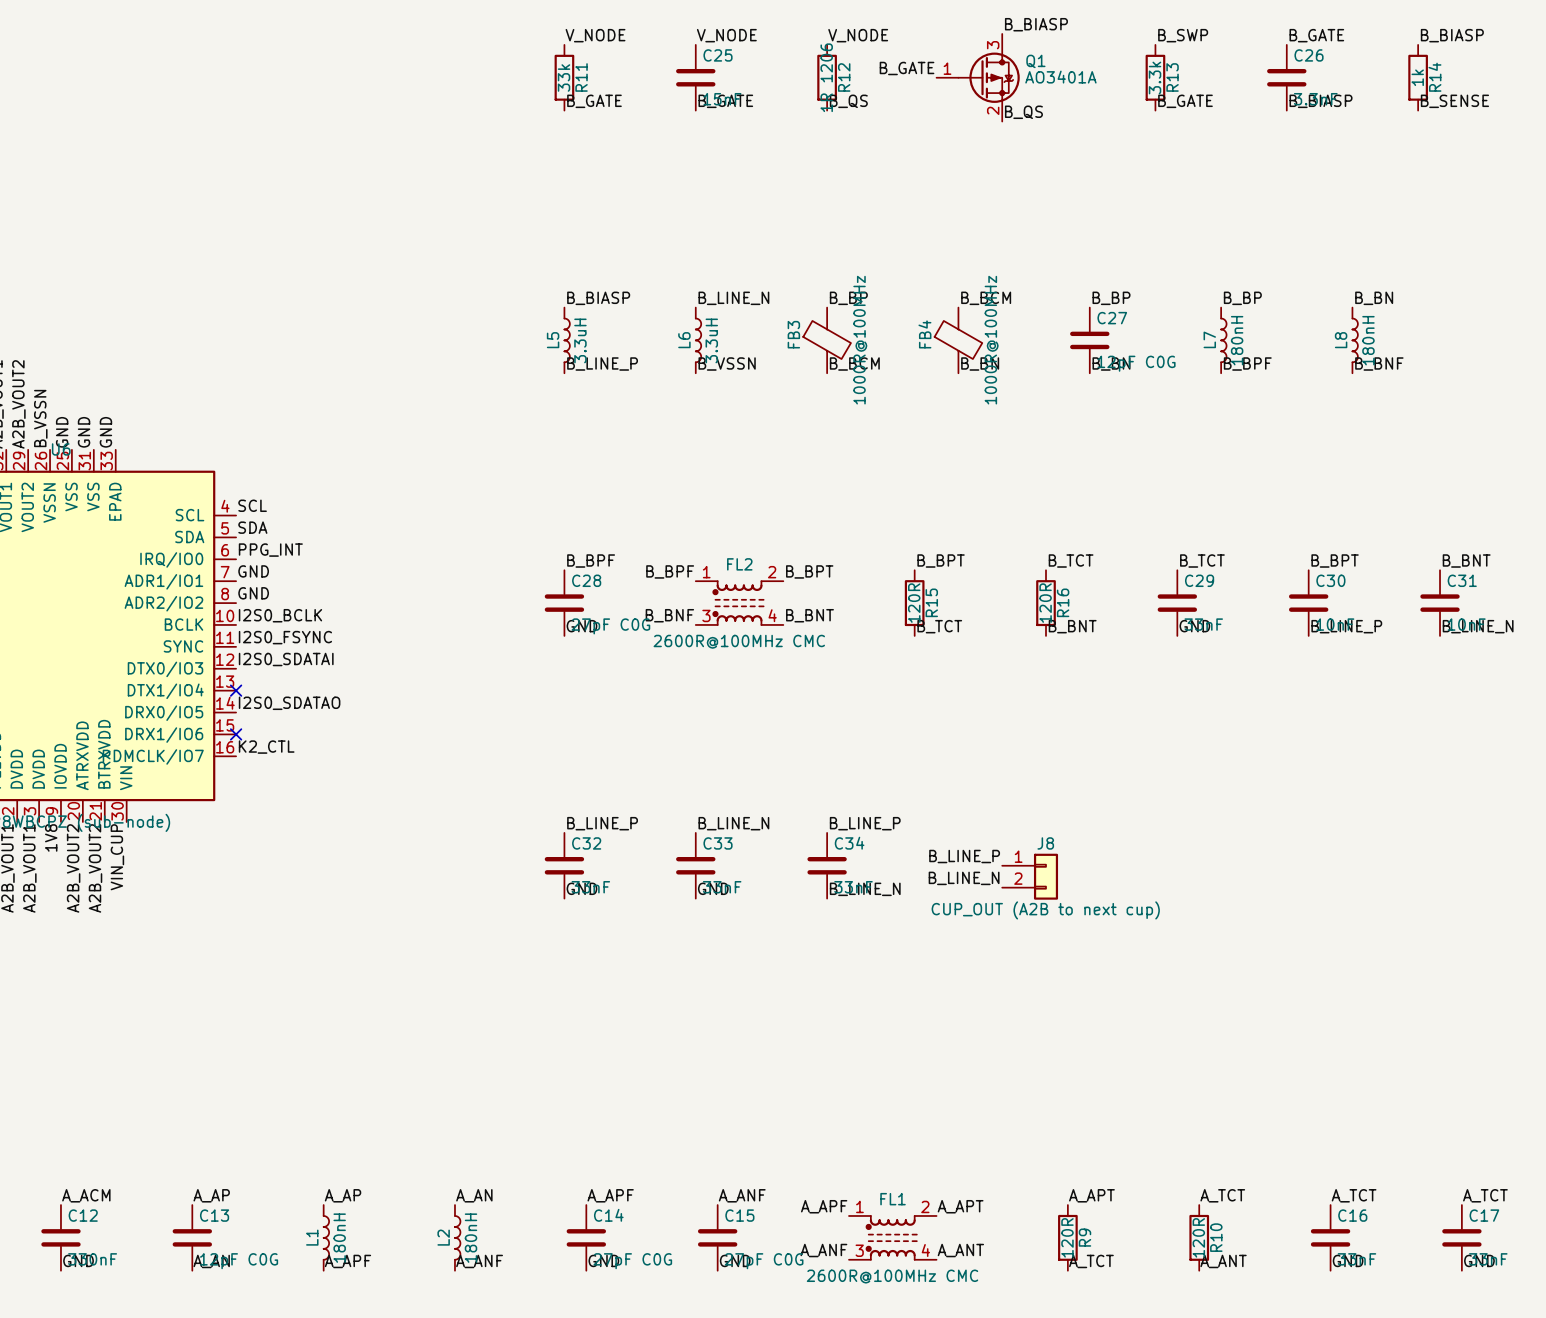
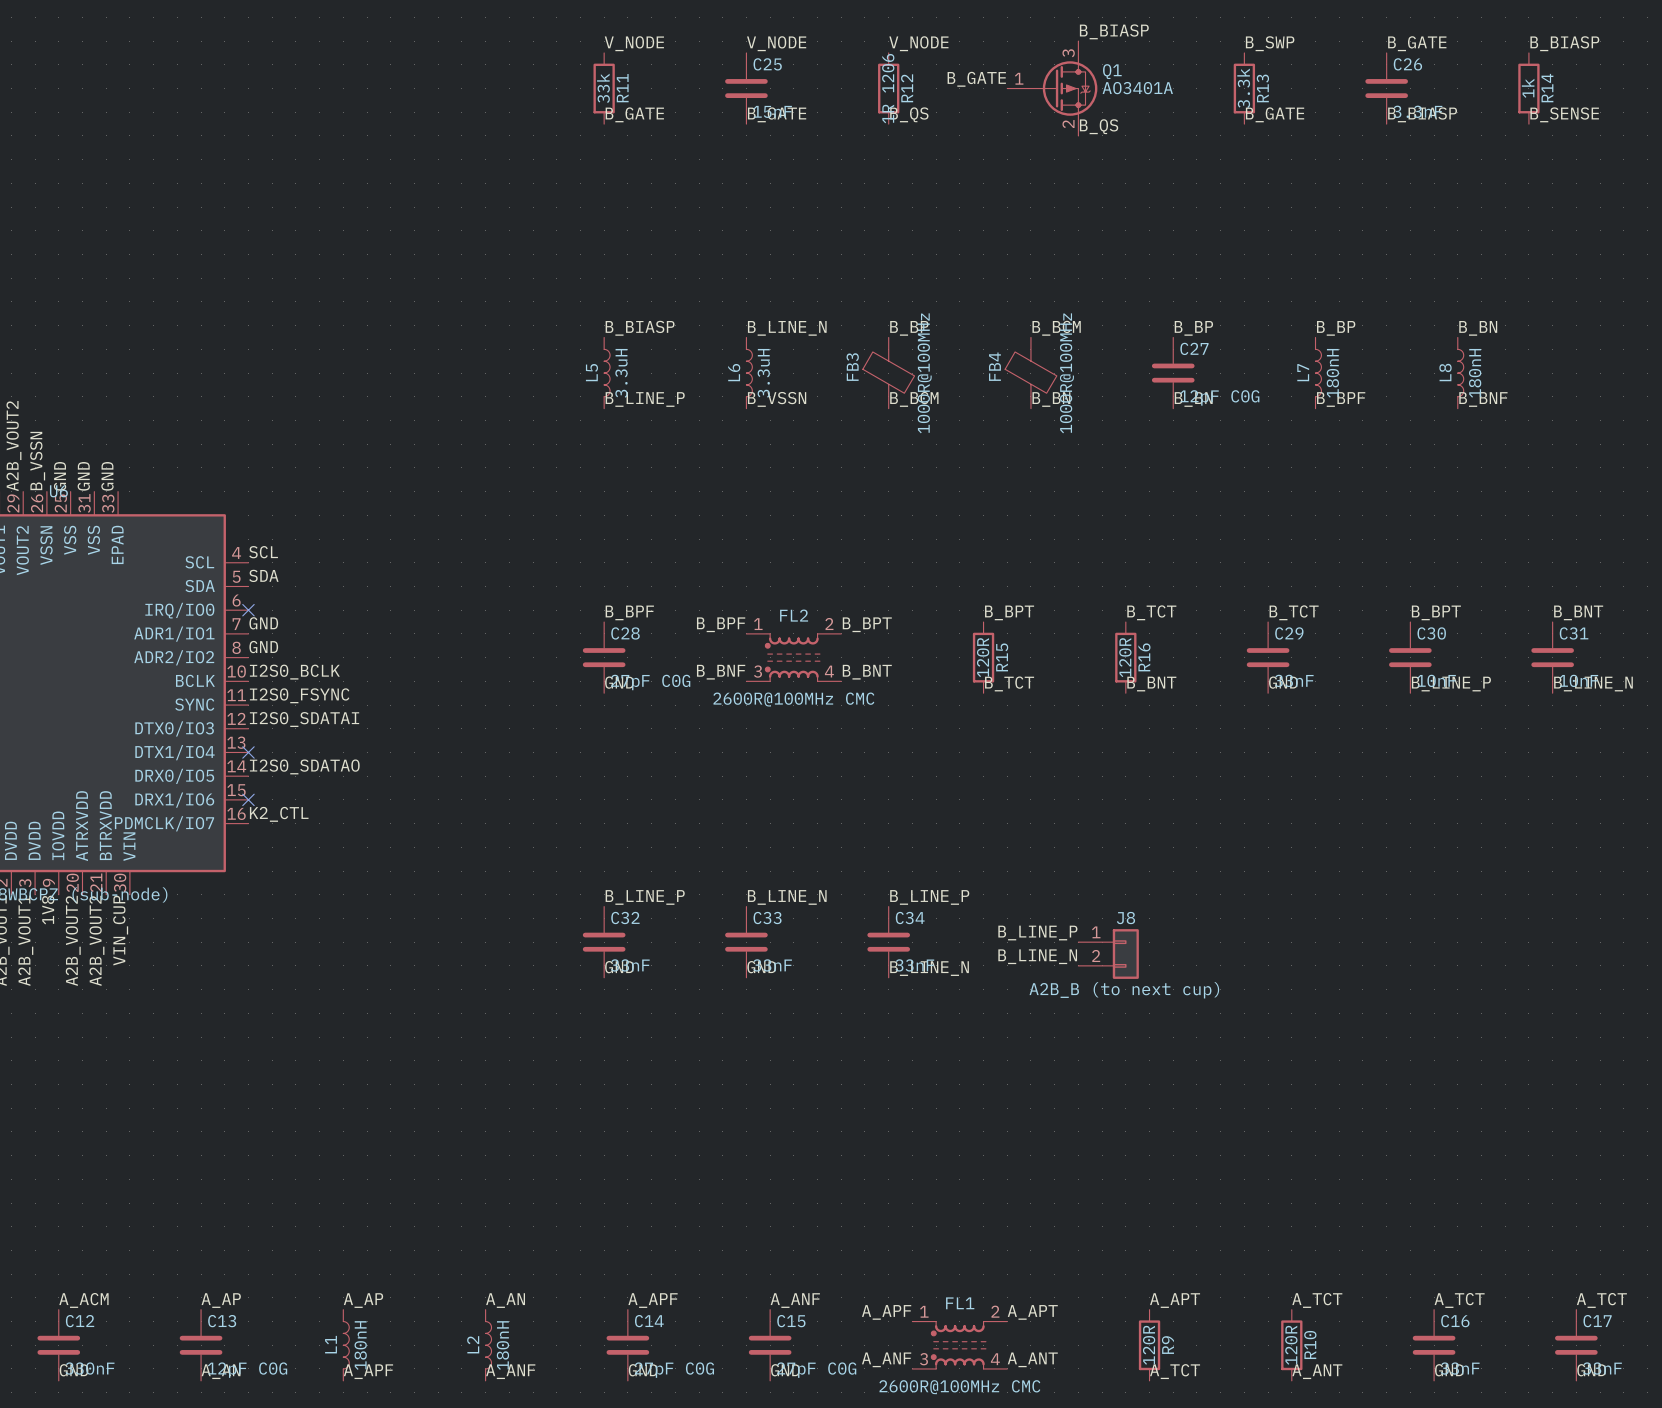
label: PPG_INT (270, 550) -> none
no-connect mark: none -> (248, 610)
J8 value: CUP_OUT (A2B to next cup) (1045, 910) -> A2B_B (to next cup) (1124, 990)

